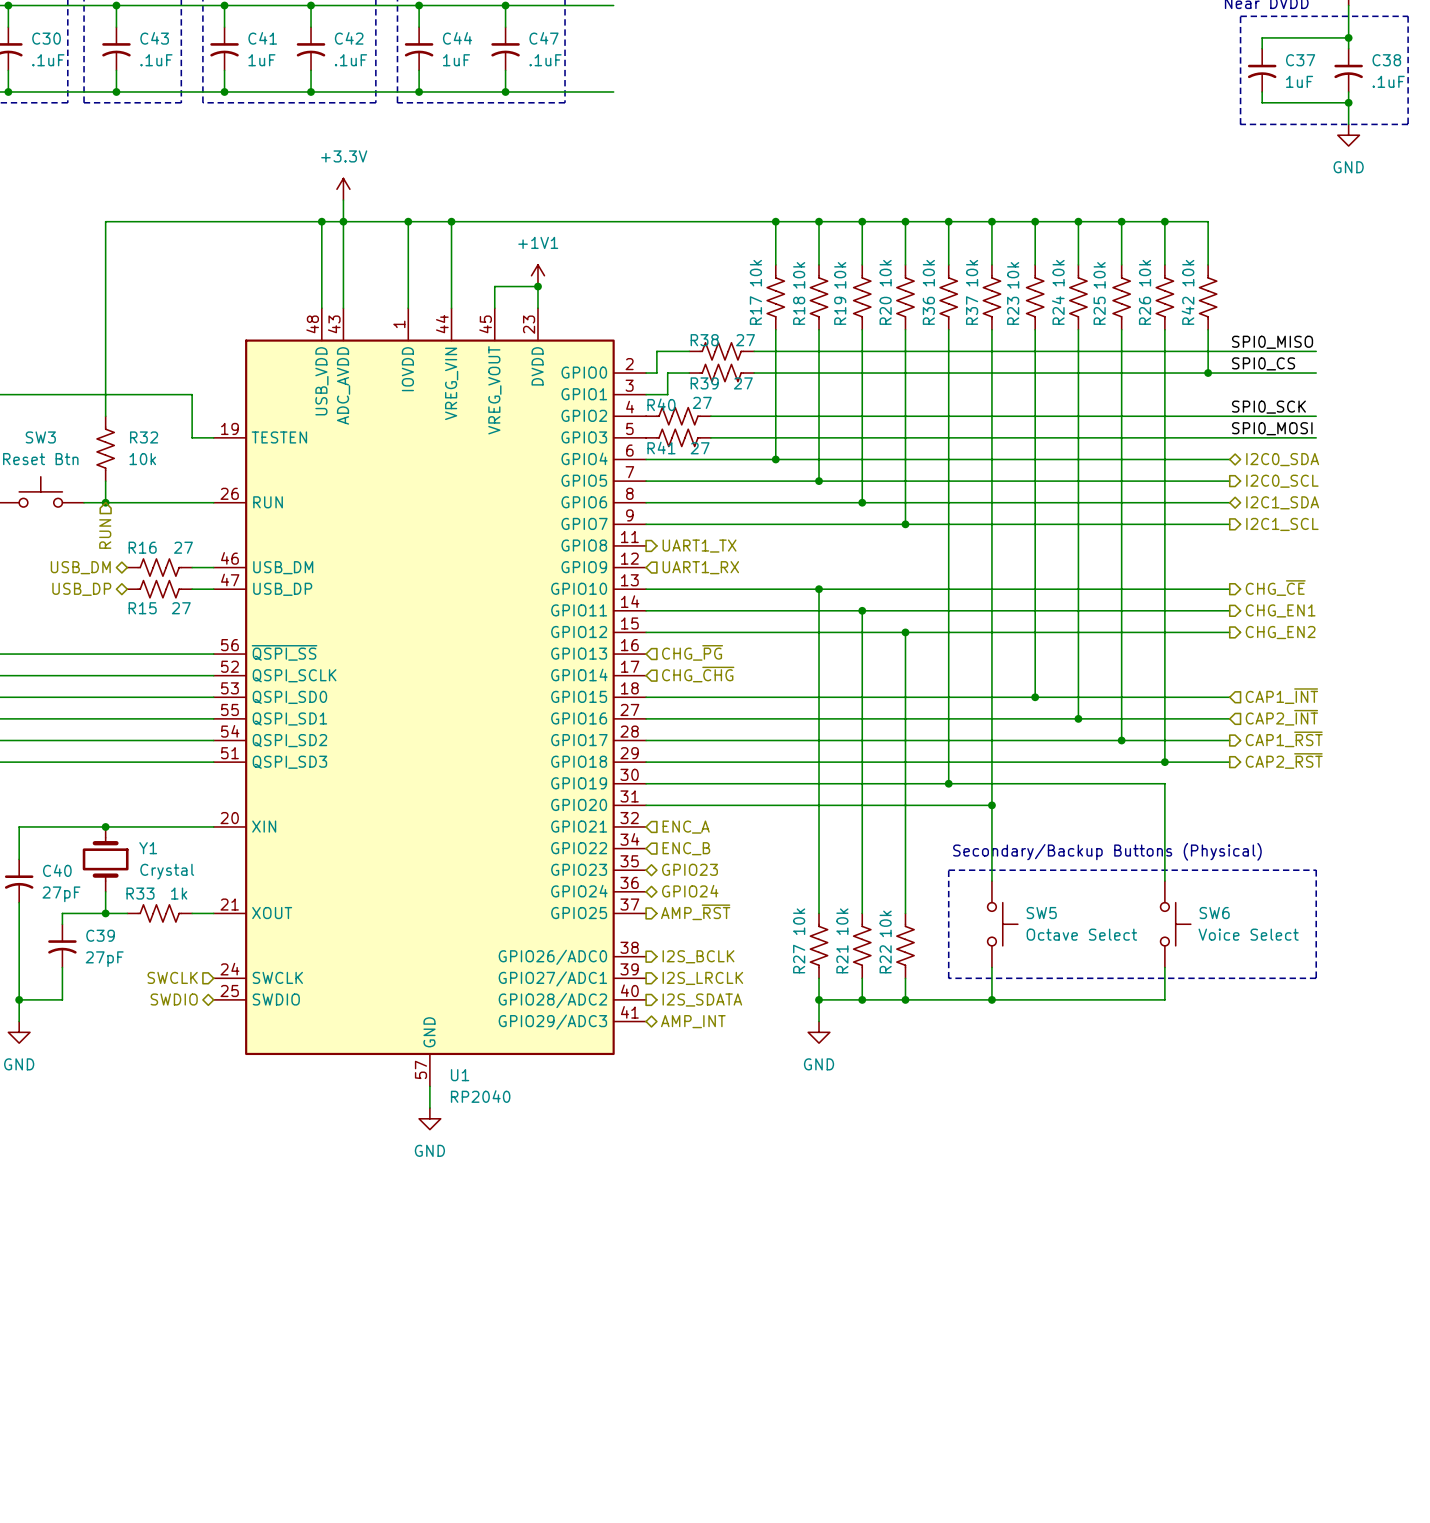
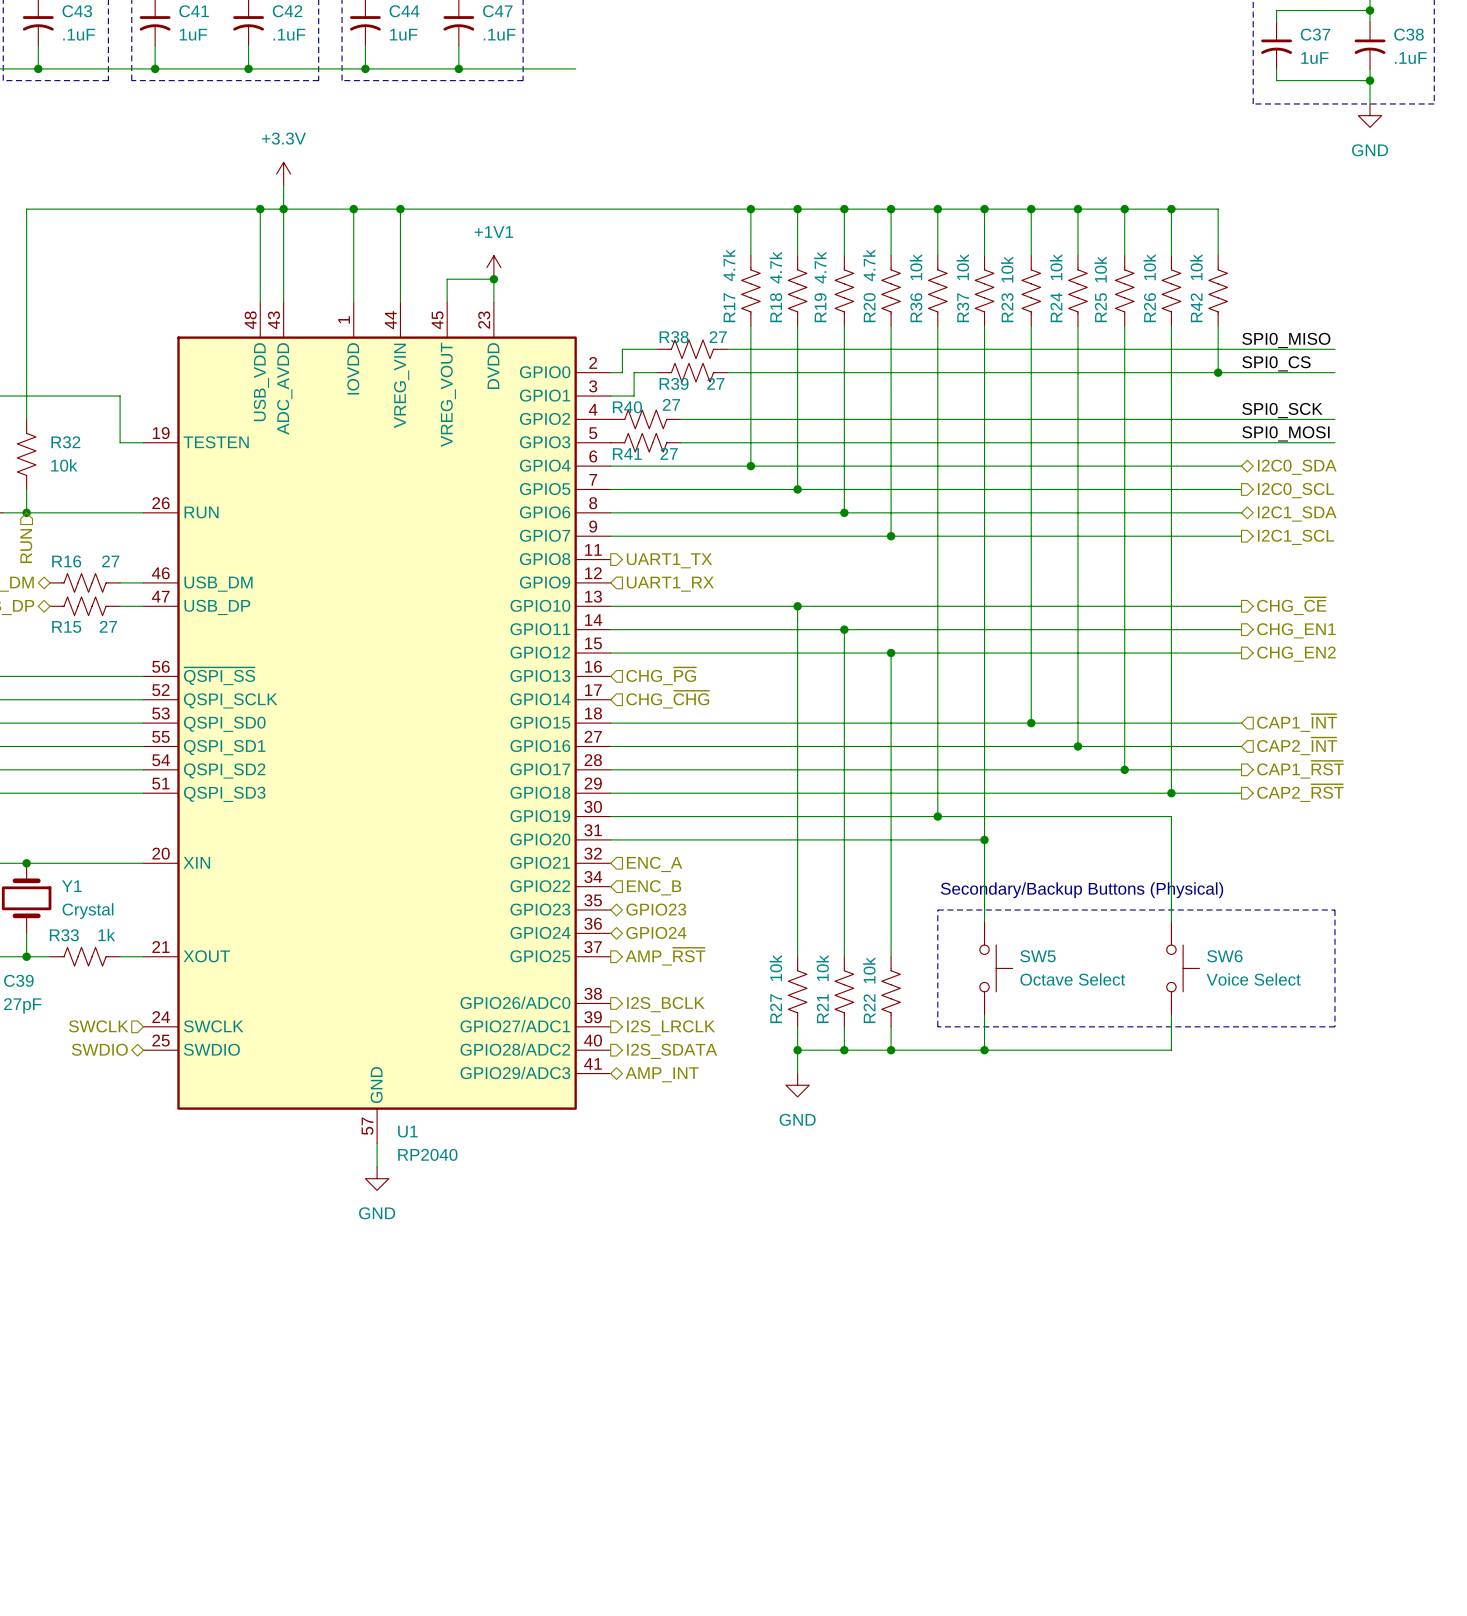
R17 value: 10k (755, 273) -> 4.7k (729, 265)
R20 value: 10k (885, 273) -> 4.7k (869, 265)
R18 value: 10k (799, 275) -> 4.7k (775, 267)
R19 value: 10k (840, 275) -> 4.7k (820, 267)

